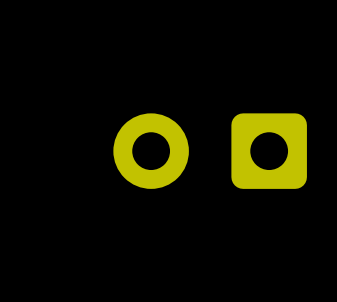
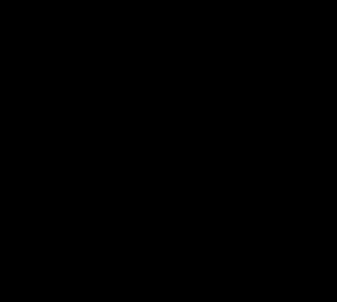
part: (210, 151) -> none

